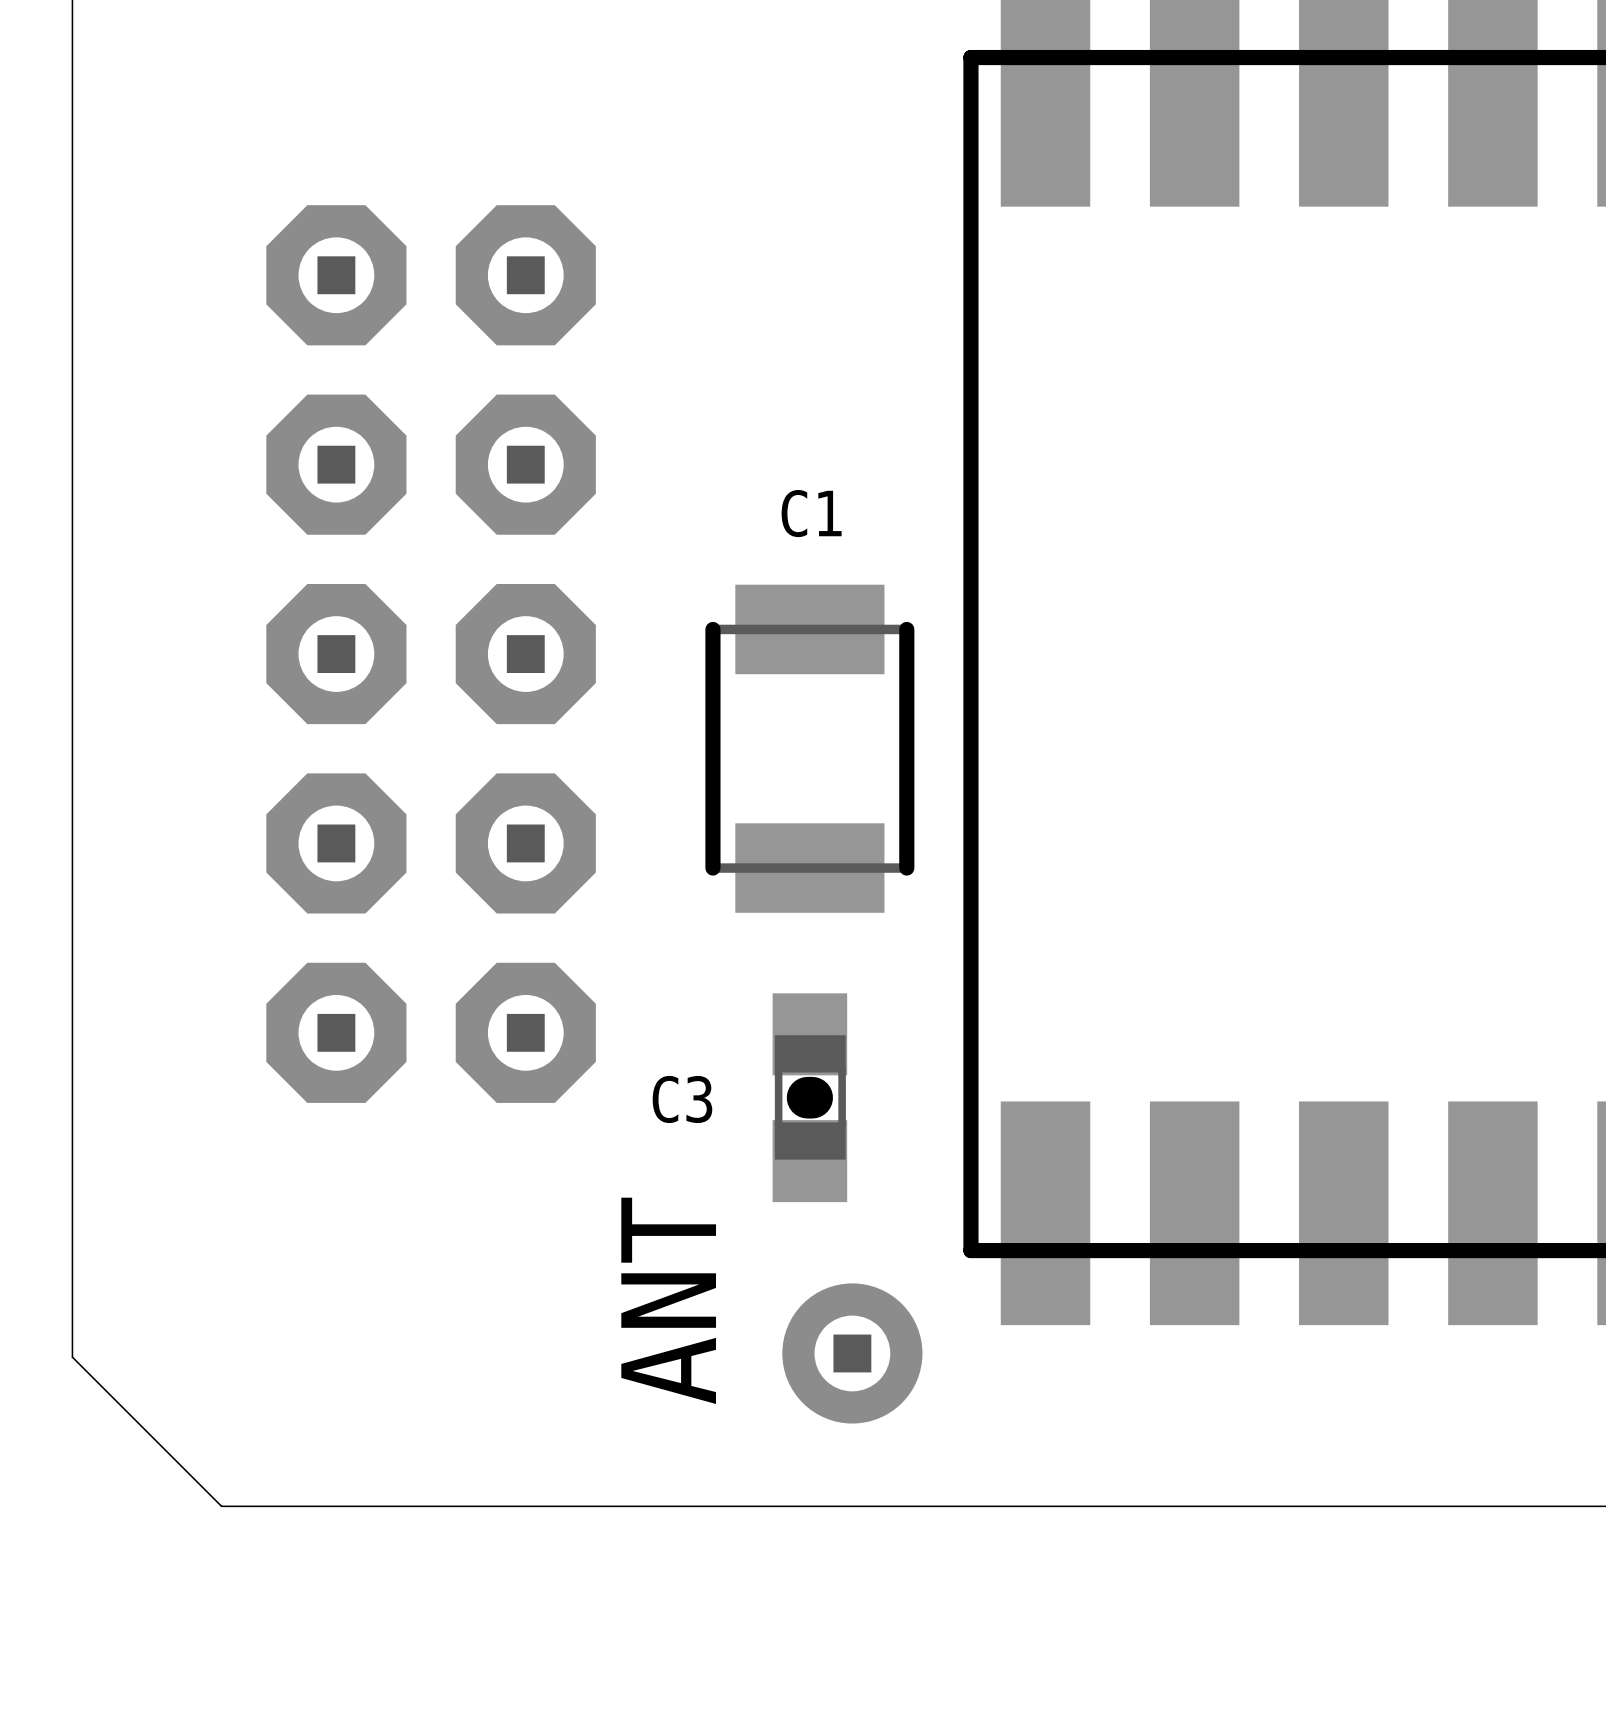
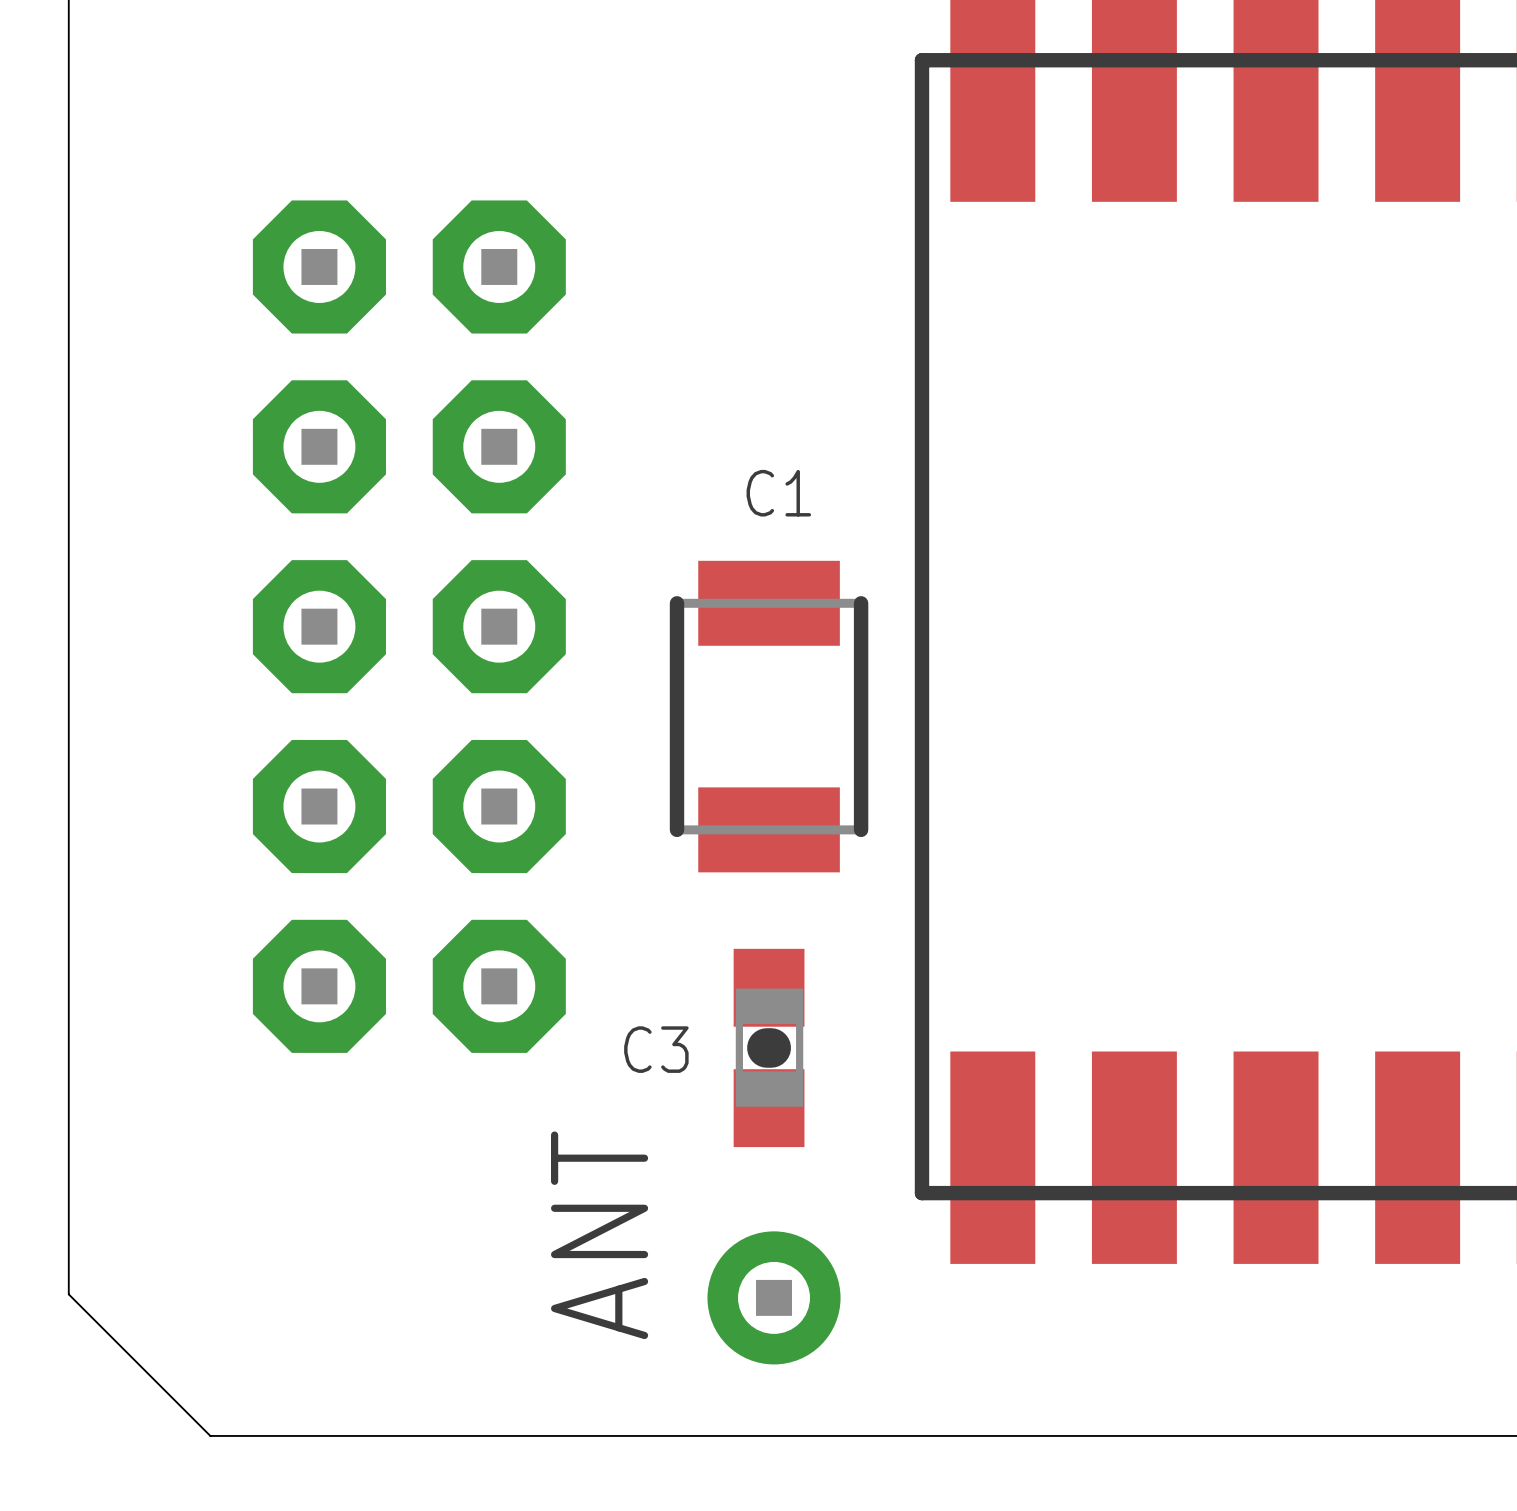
ANT position: (852, 1353) -> (774, 1297)

